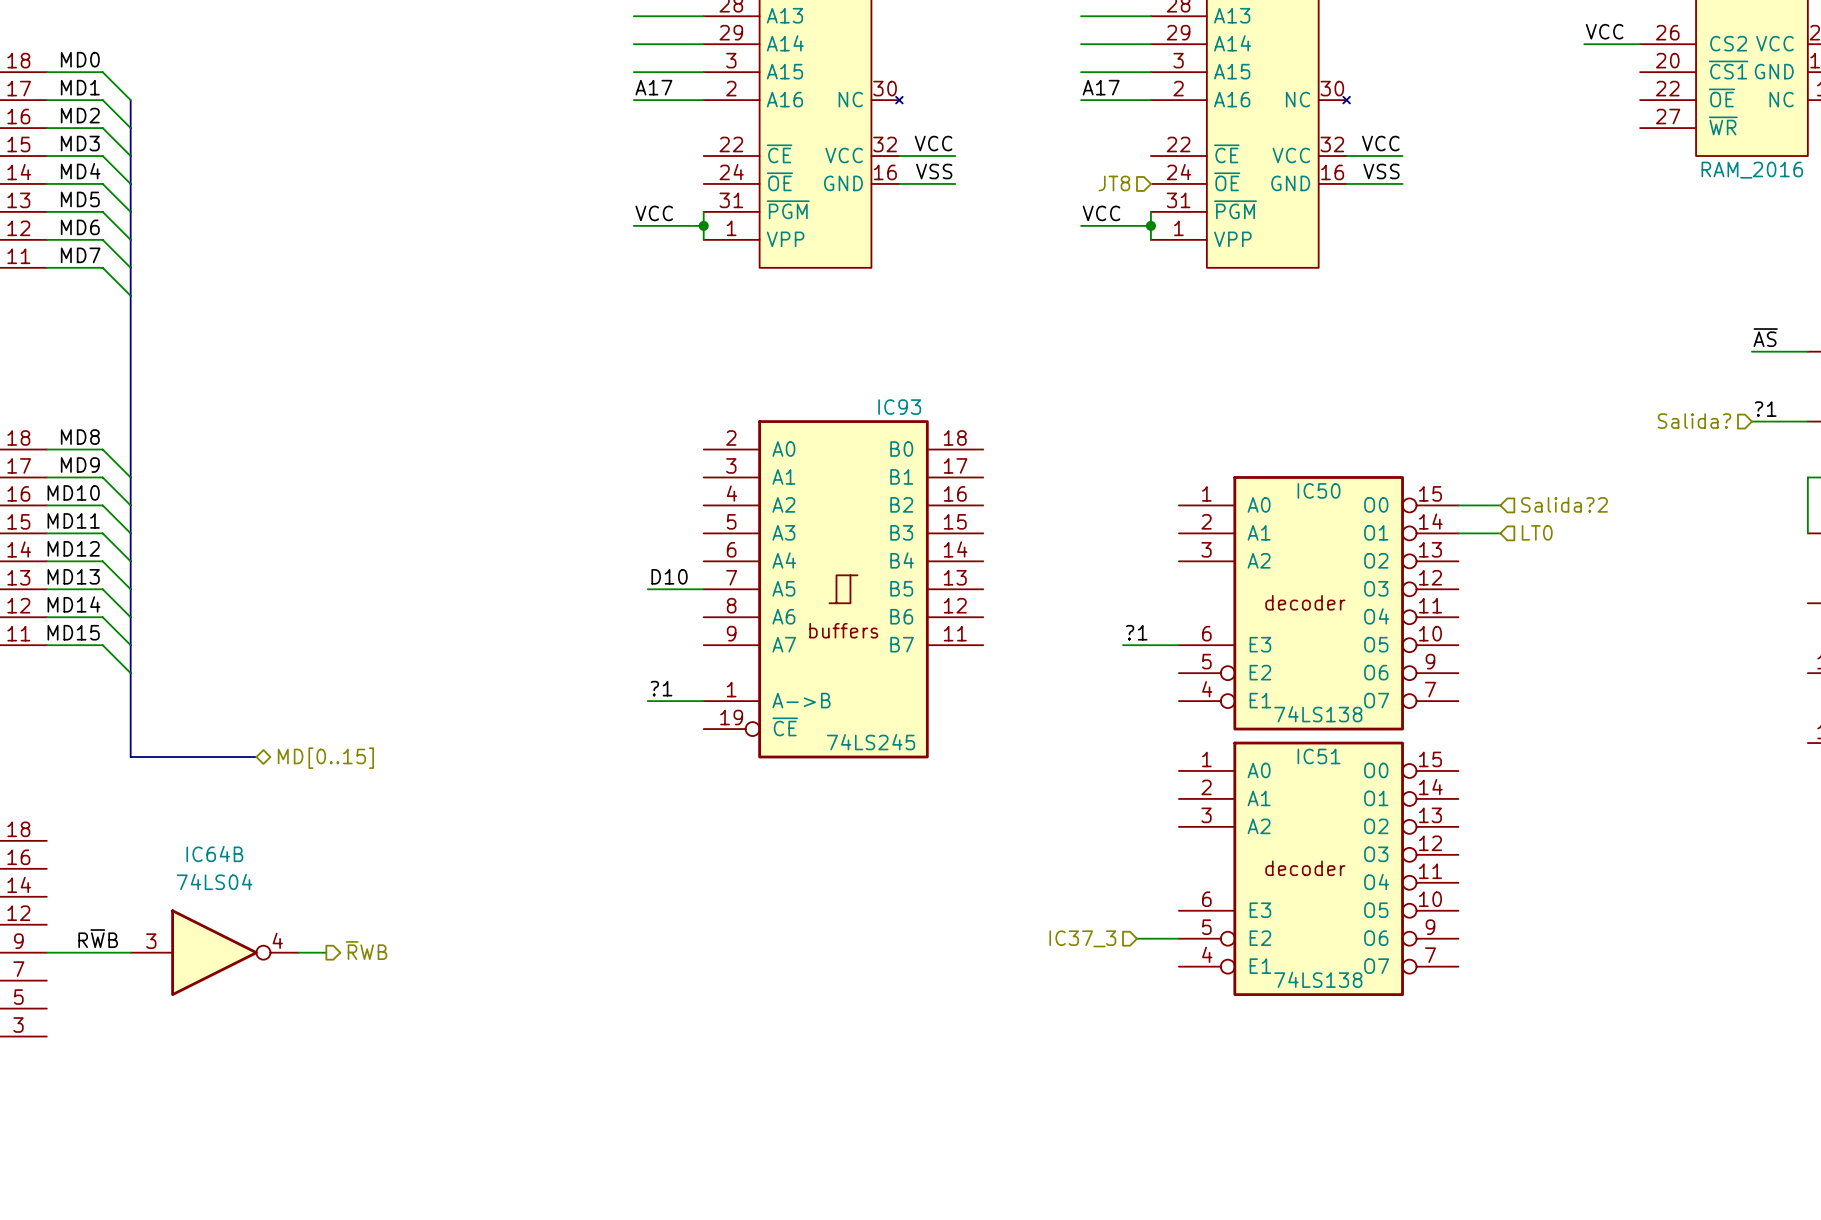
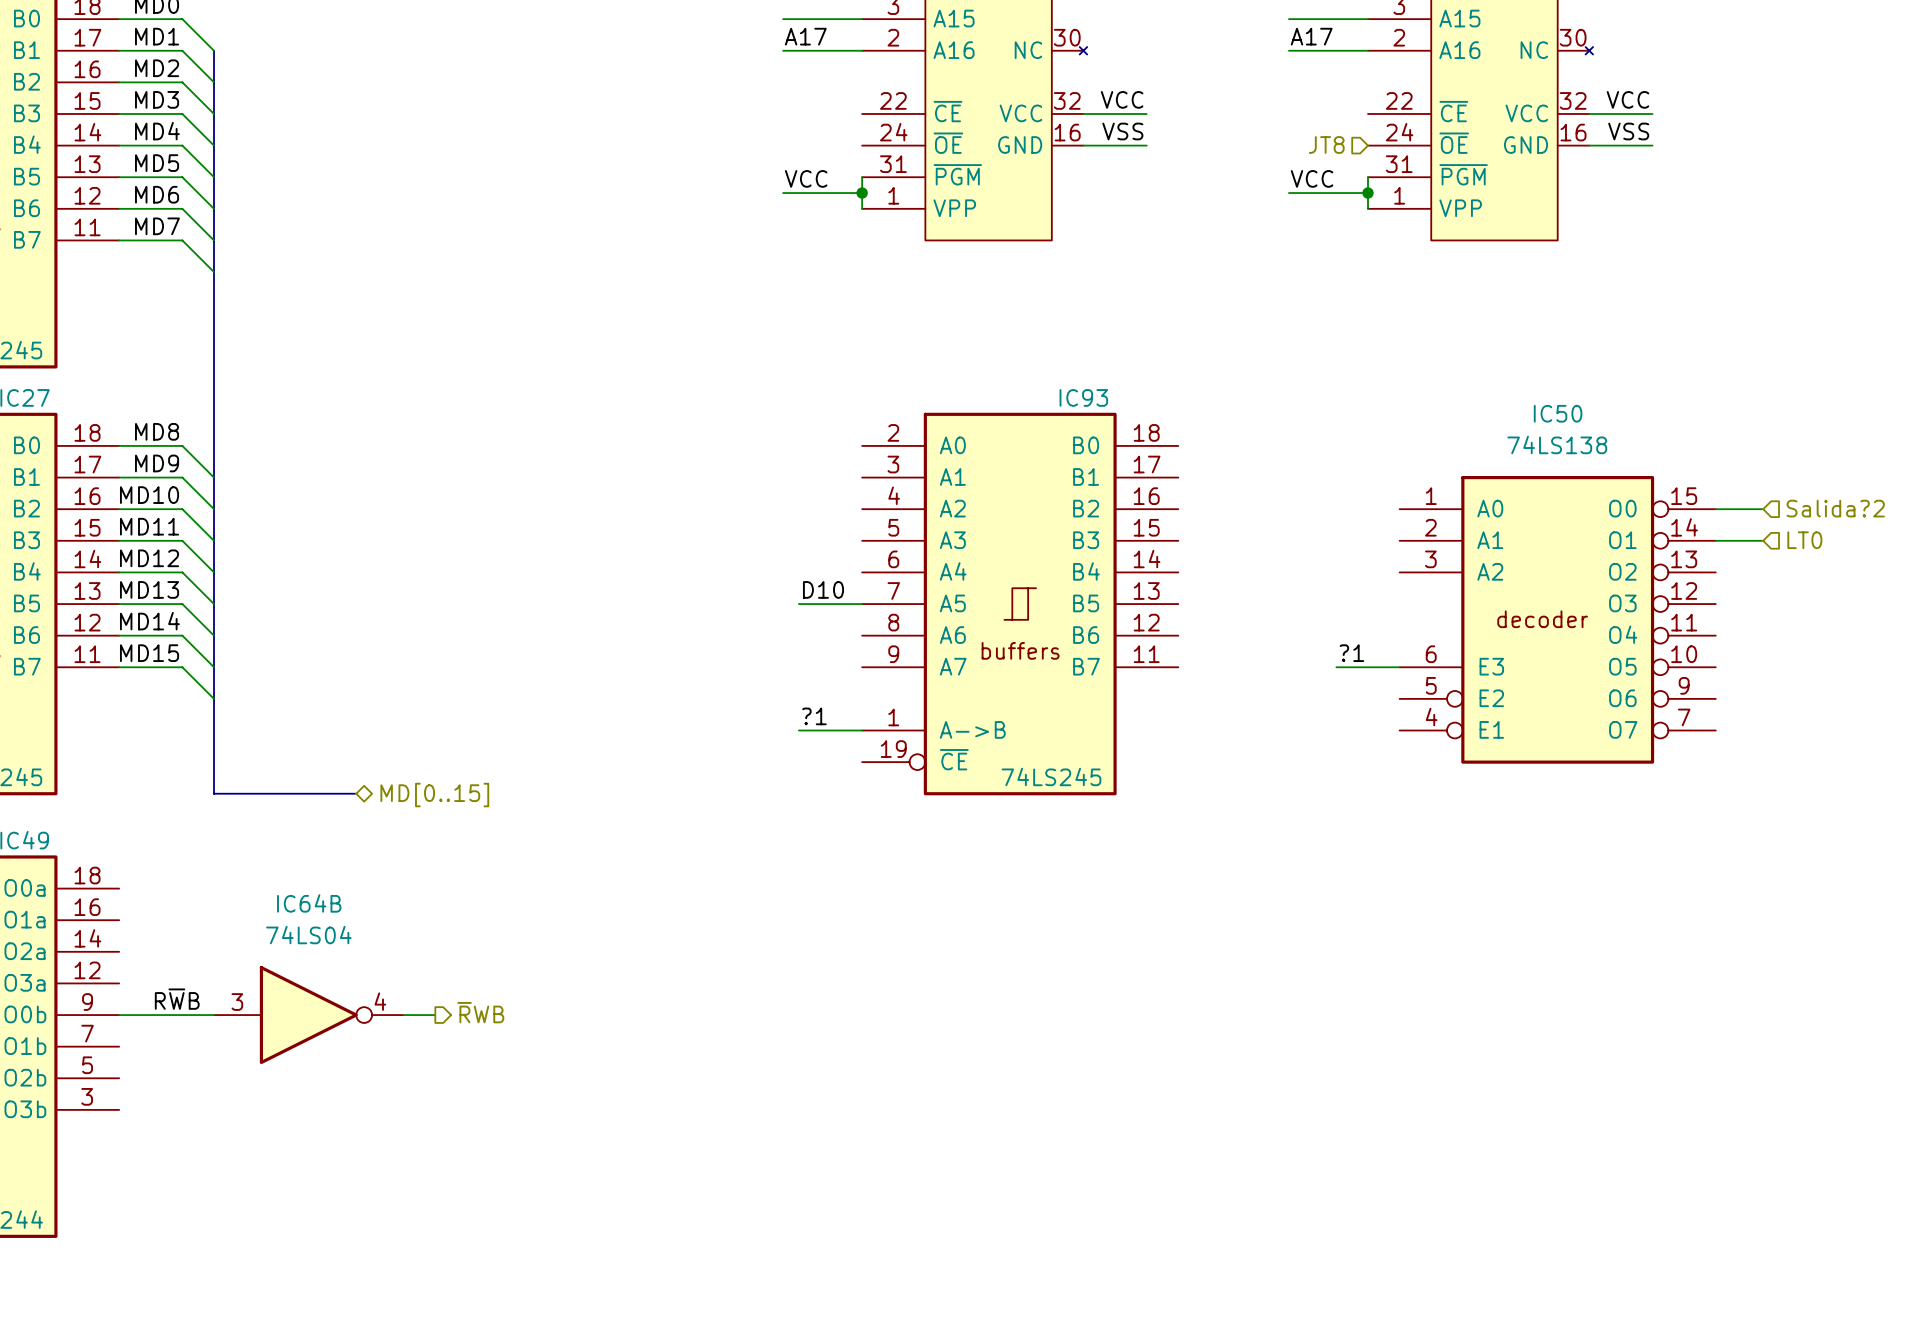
IC50 name position: IC50 (1319, 490) -> IC50 (1558, 413)
IC50 value position: 74LS138 (1318, 714) -> 74LS138 (1557, 444)
IC51: 74LS138 (1318, 868) -> none
hierarchical label: IC37_3 (1082, 938) -> none
wire: (1136, 938) (1178, 938) -> none

